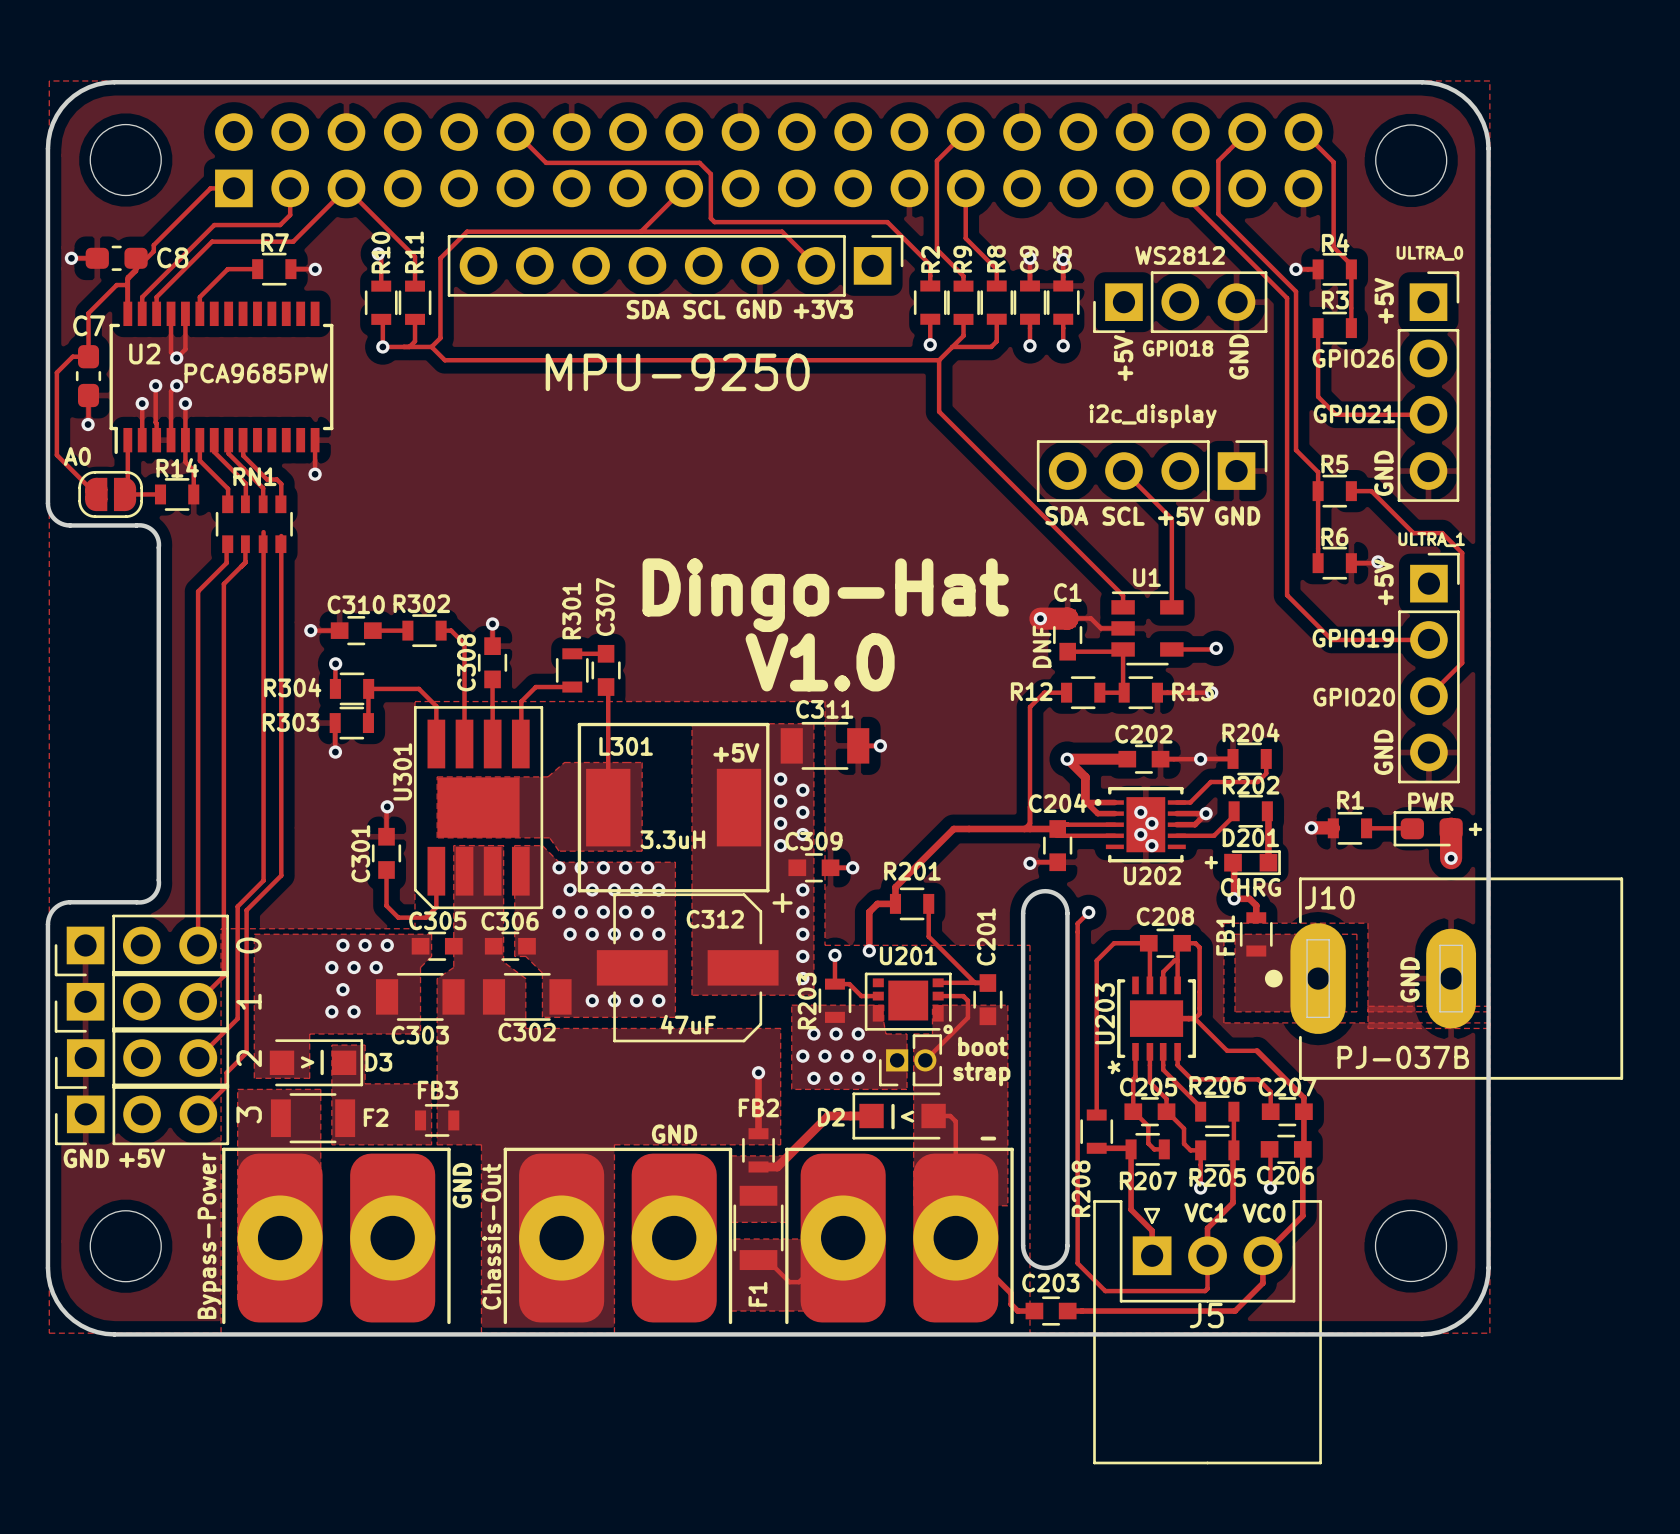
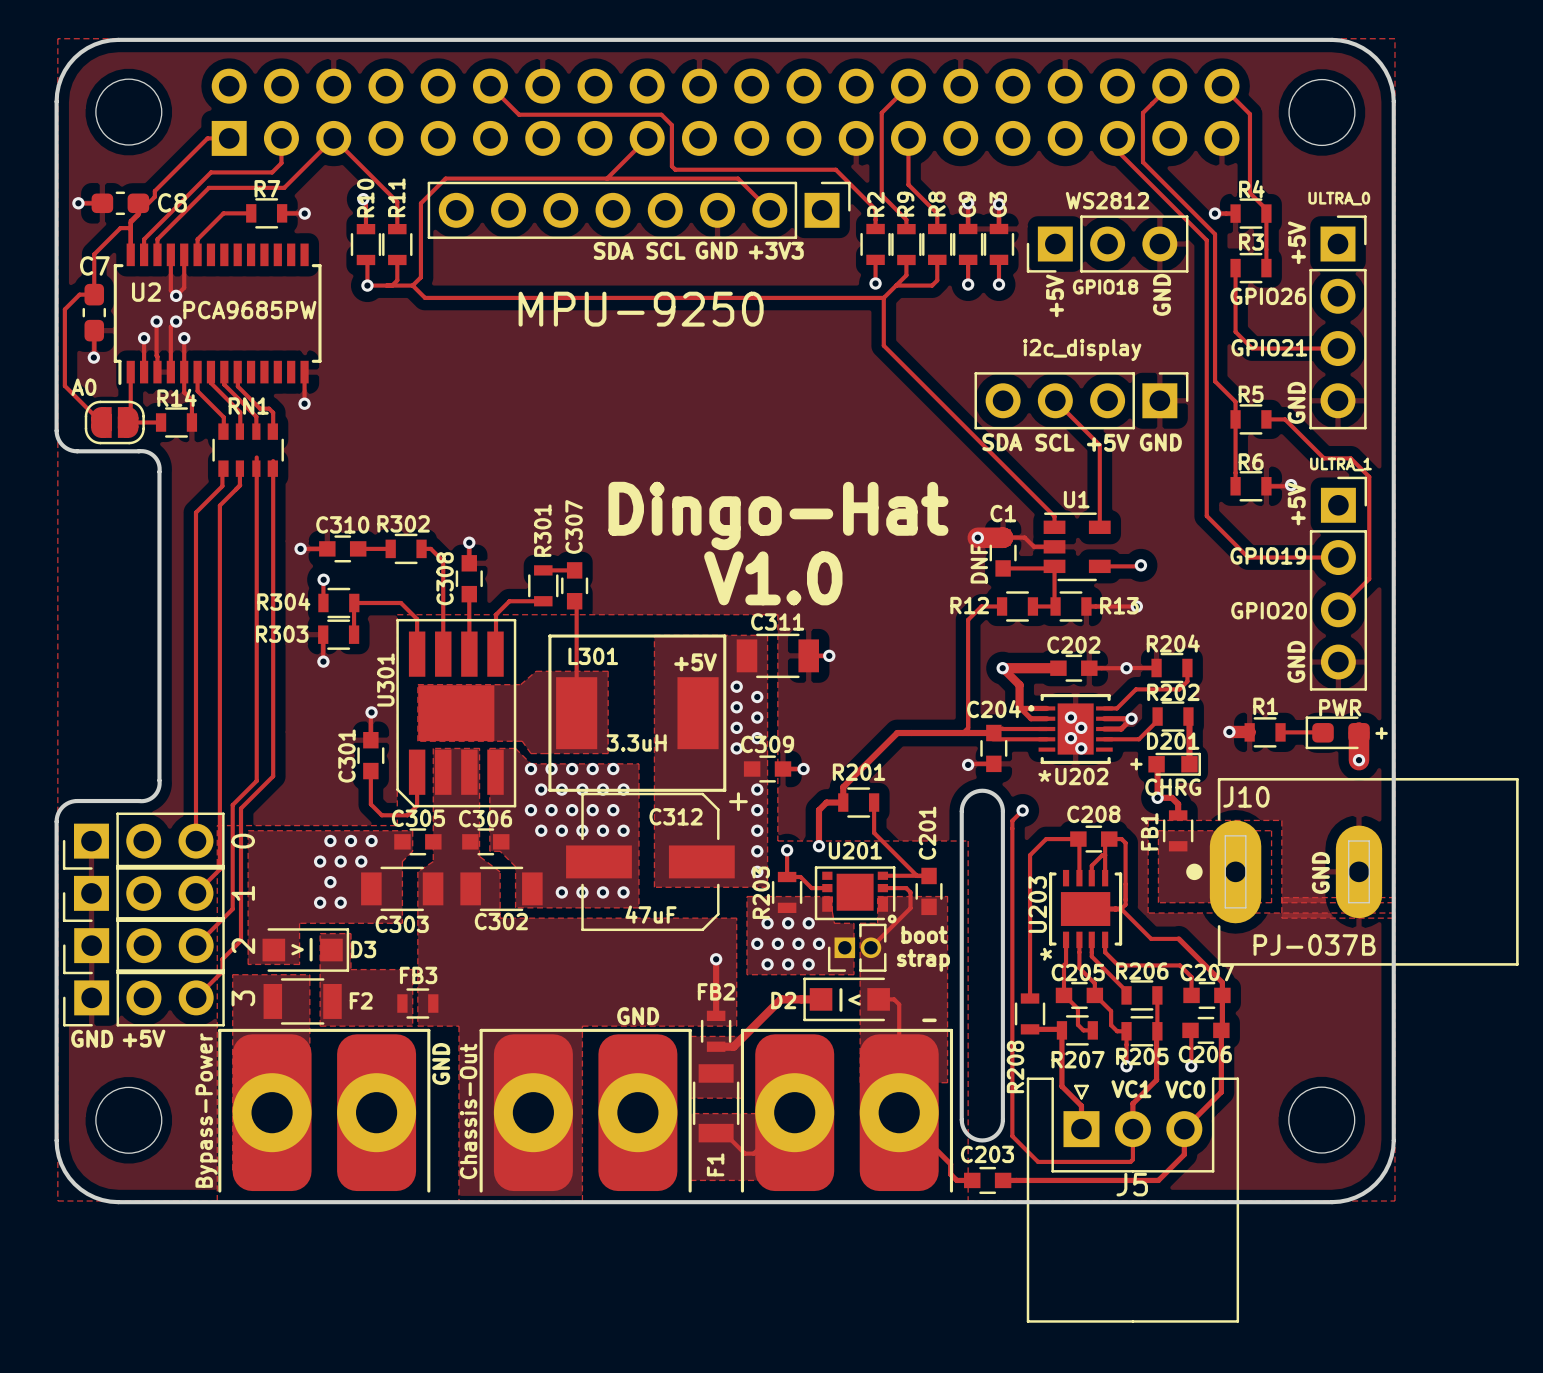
U202 text: none -> * (1044, 775)

